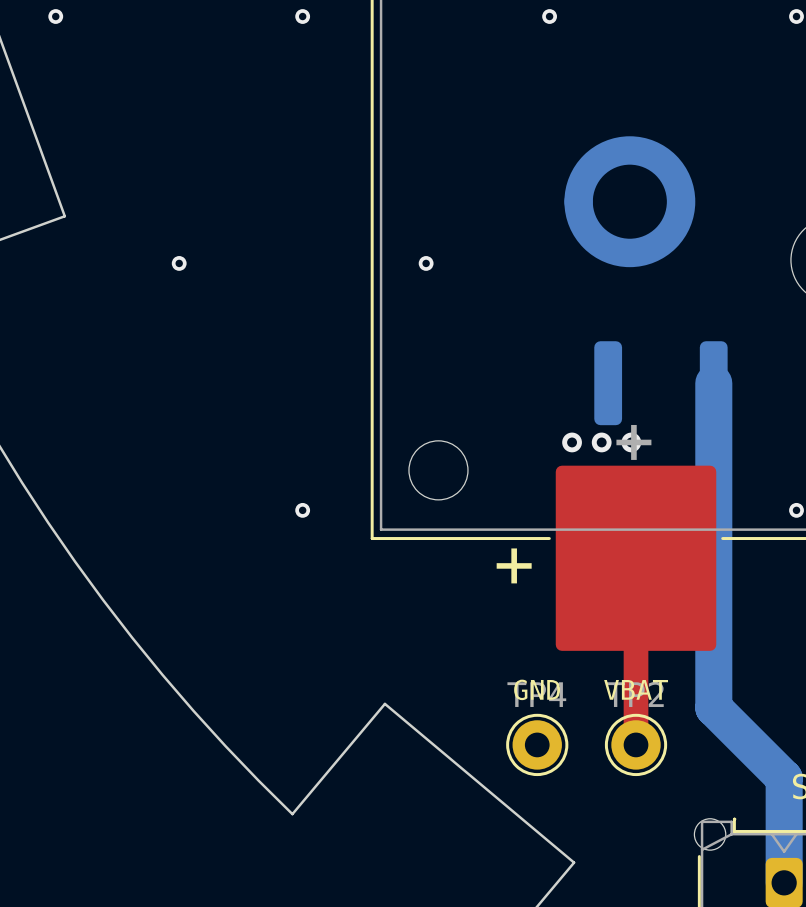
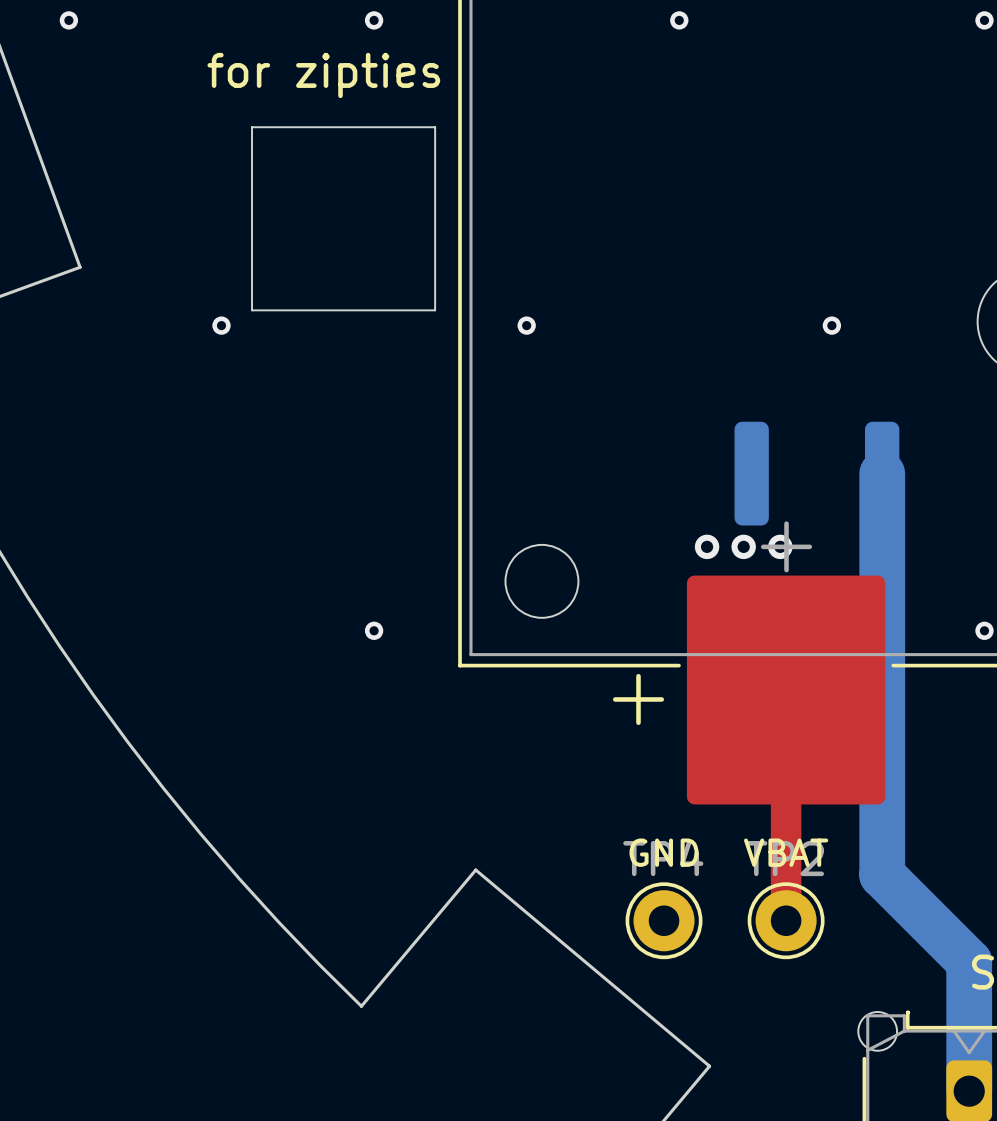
text: none -> for zipties (323, 75)
board edge: none -> (252, 127) (435, 127) (435, 310) (252, 310) (252, 127)
part: (629, 201) -> none
via: none -> (831, 325)

